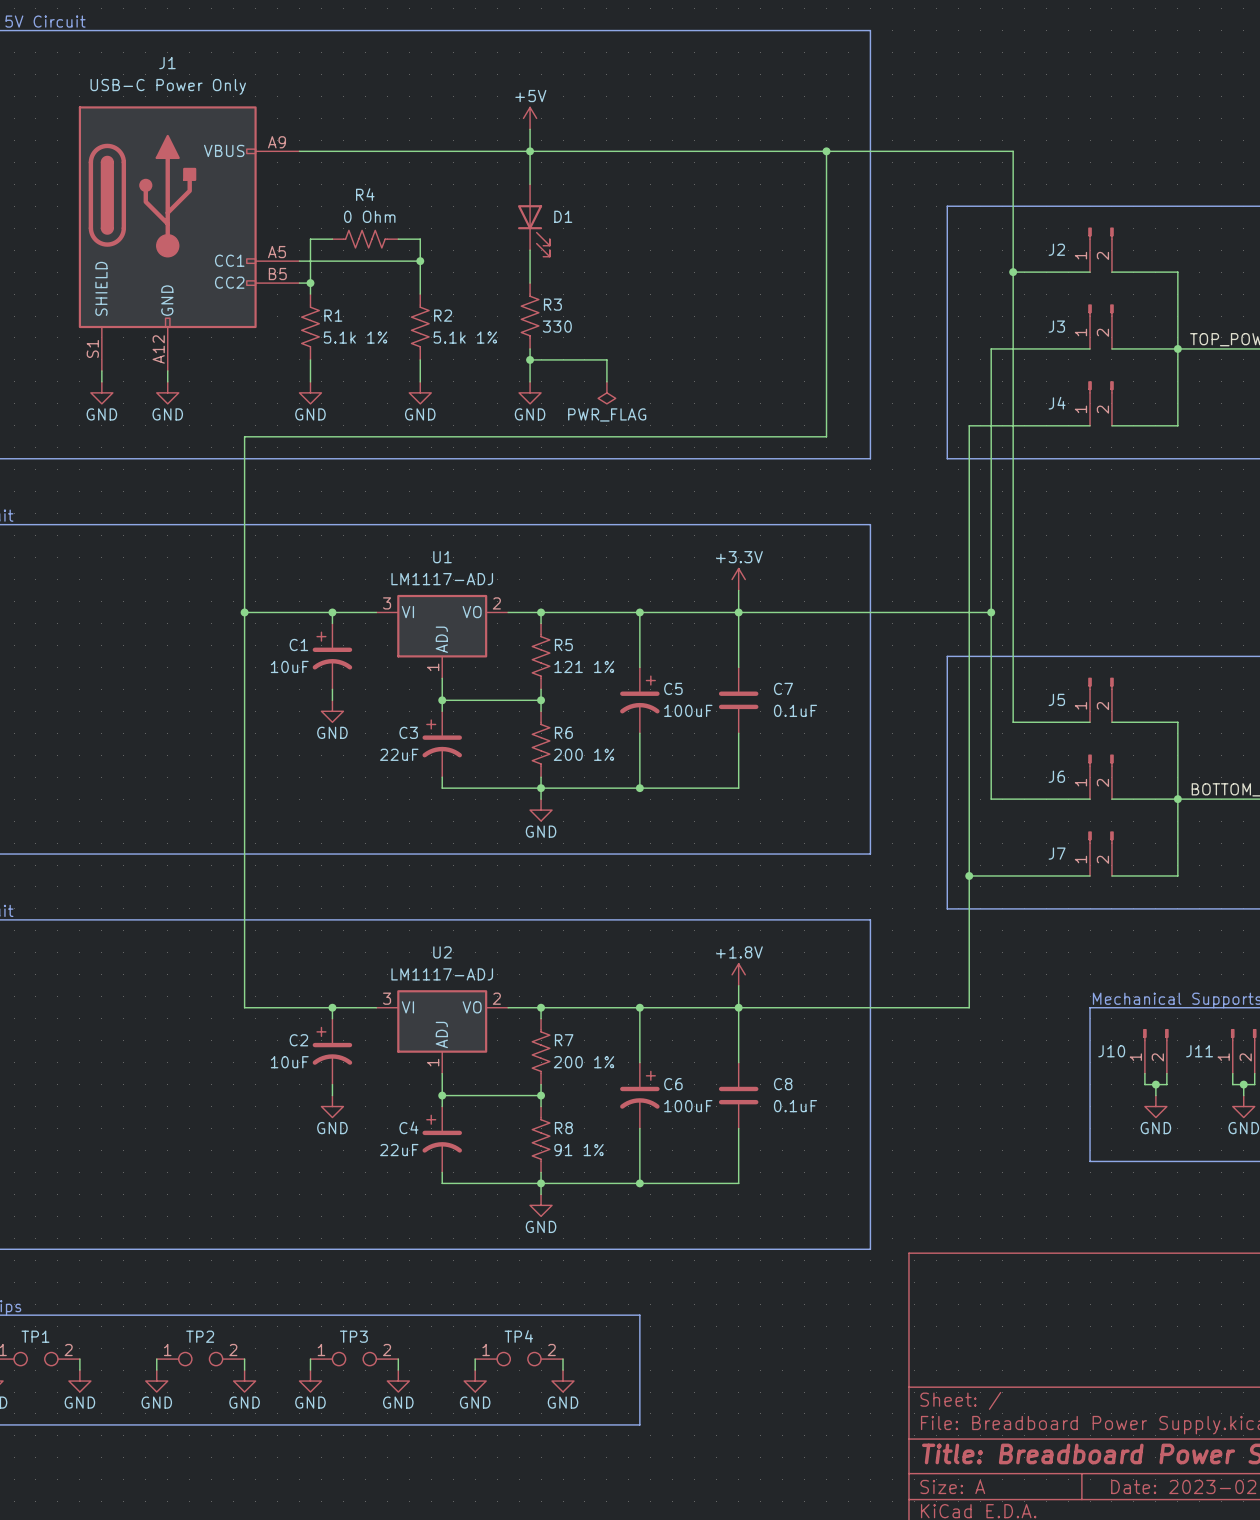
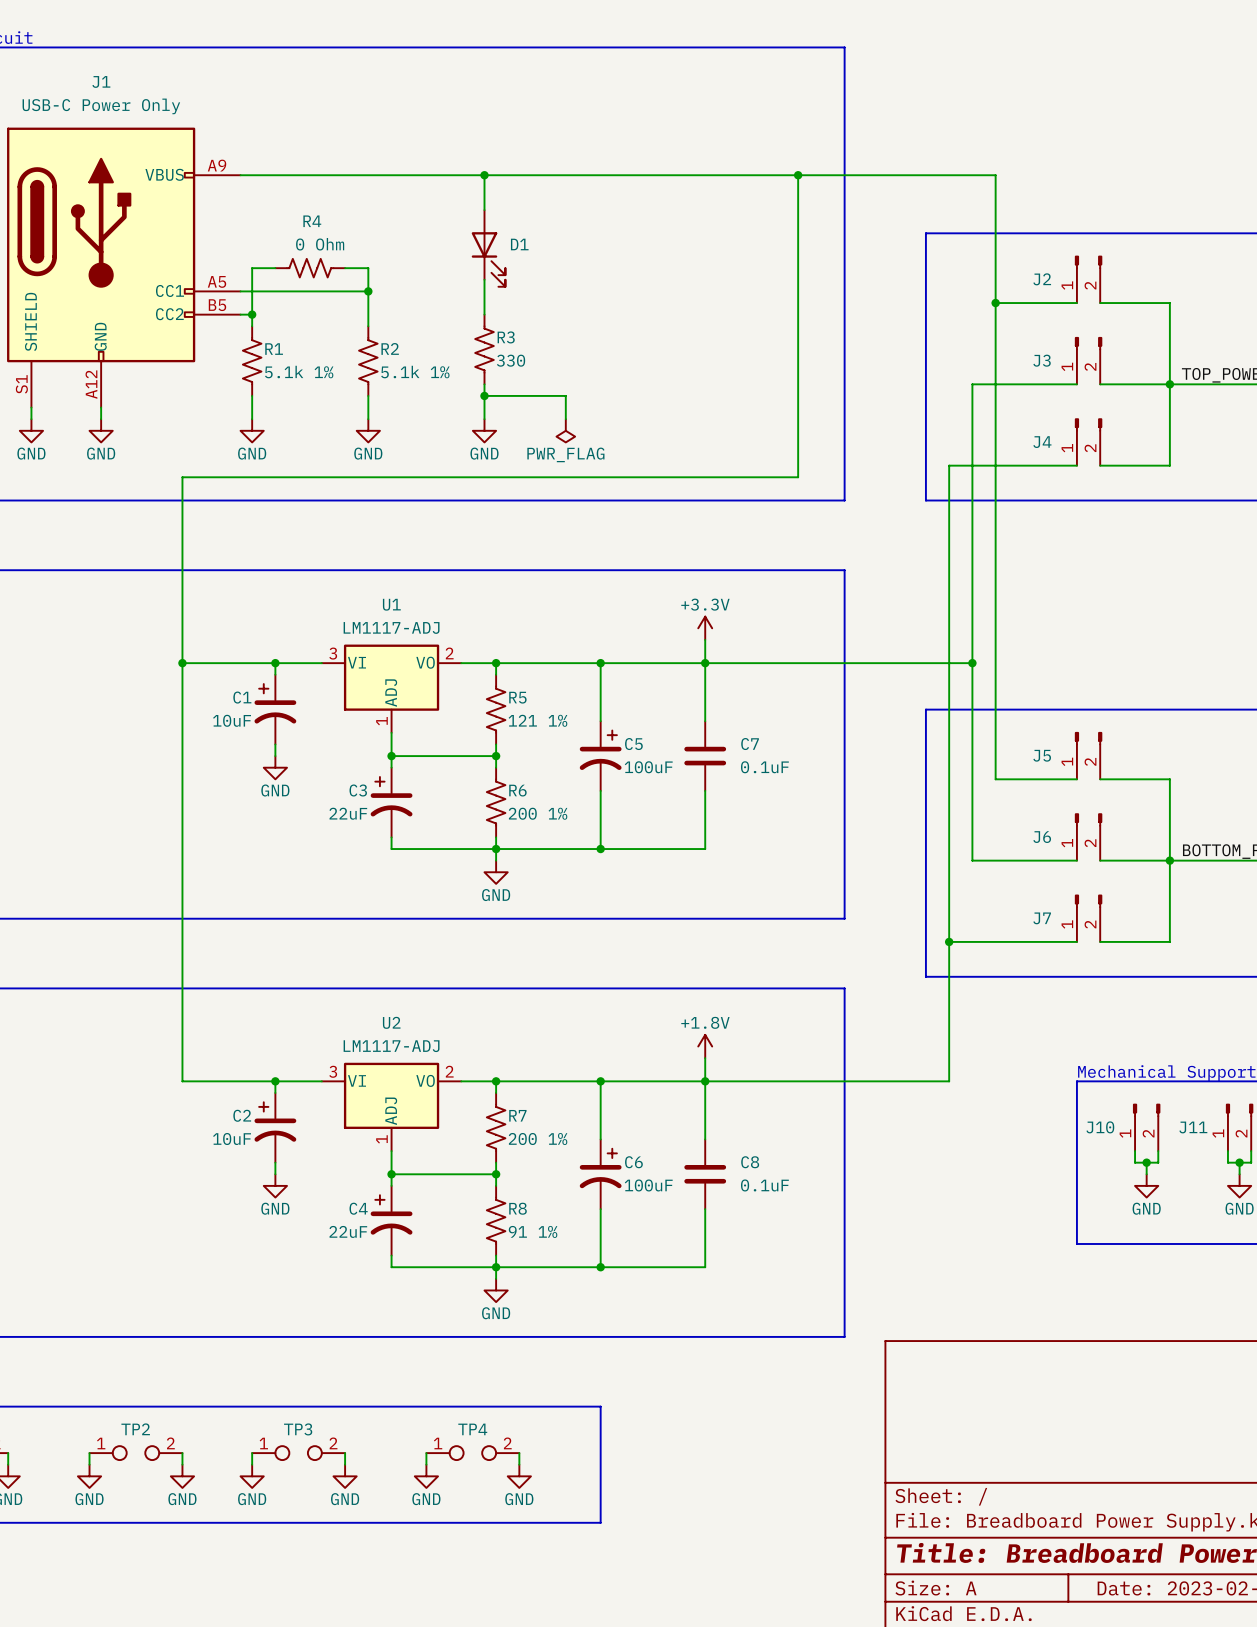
power symbol: +5V (530, 118) -> none
wire: (530, 129) (530, 151) -> none

